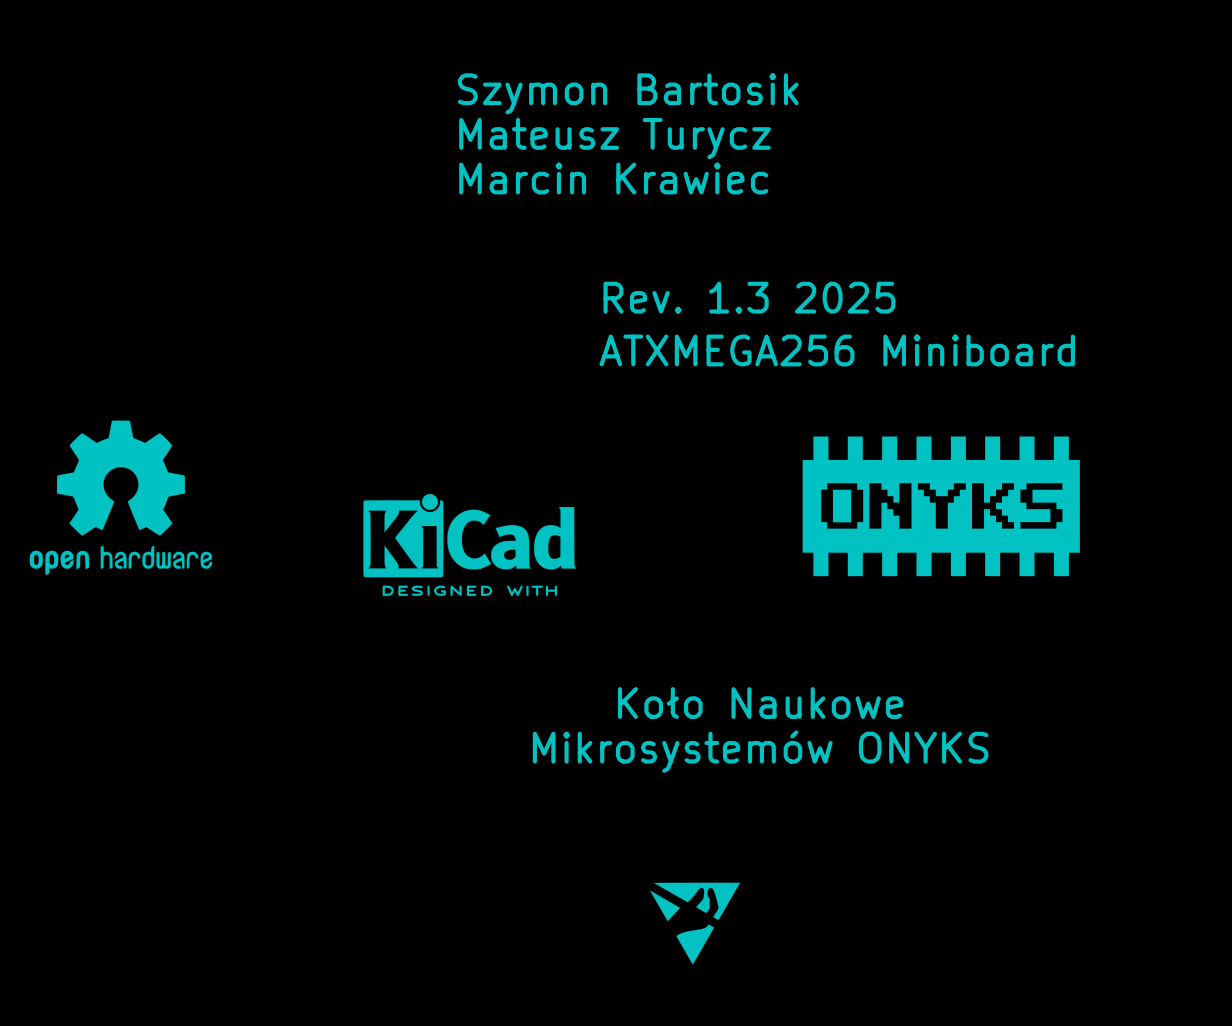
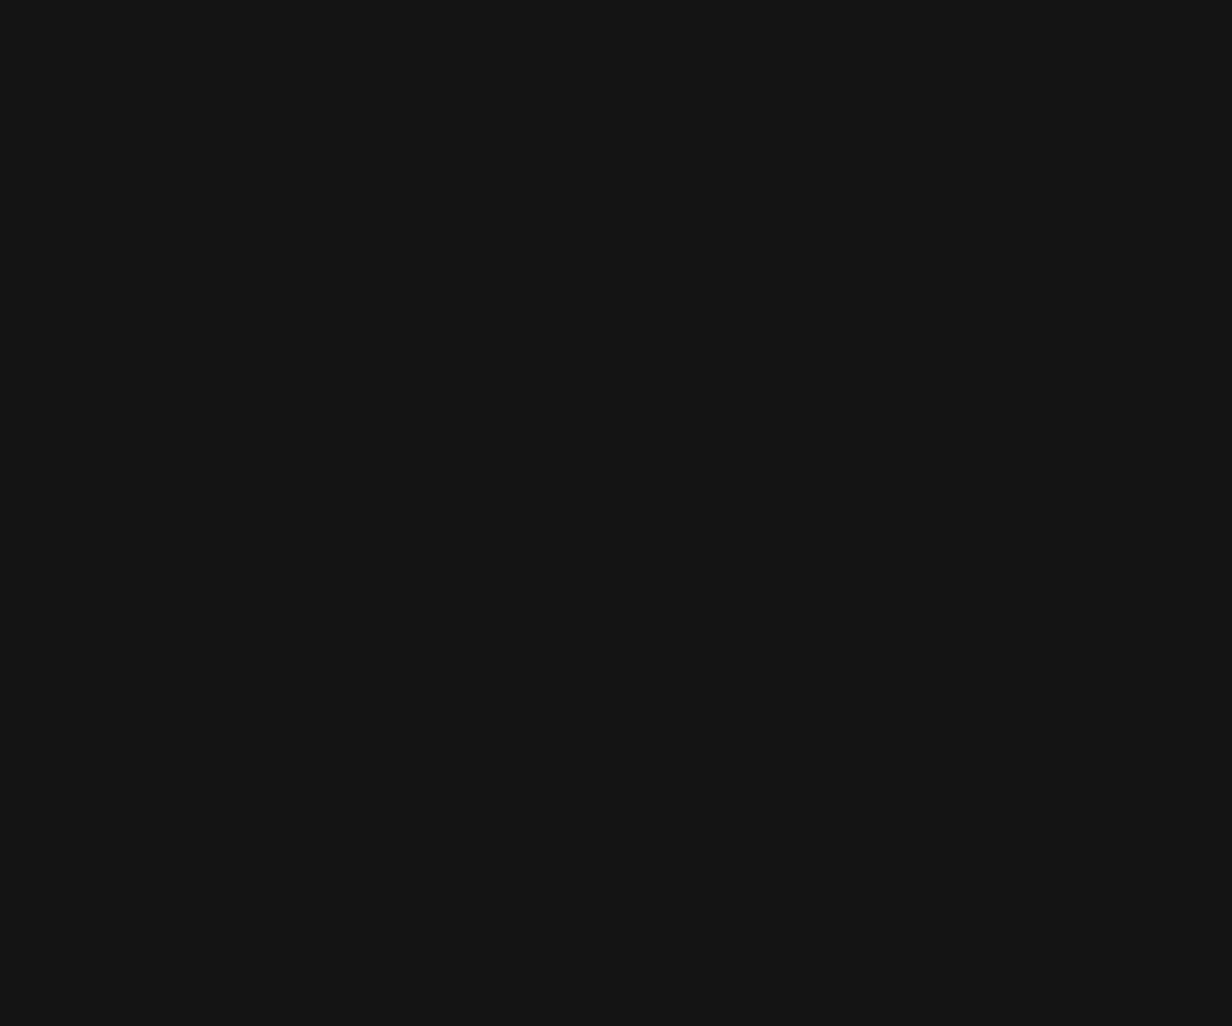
text: Szymon Bartosik (628, 93) -> none
text: Mateusz Turycz (615, 138) -> none
text: Marcin Krawiec (613, 178) -> none
text: Rev. 1.3 2025 (749, 297) -> none
text: ATXMEGA256 Miniboard (837, 350) -> none
drawing: [29, 420, 213, 575] -> none
drawing: [802, 436, 1080, 577] -> none
drawing: [363, 493, 577, 596] -> none
text: Koło Naukowe (760, 703) -> none
text: Mikrosystemów ONYKS (760, 751) -> none
drawing: [650, 882, 741, 965] -> none

